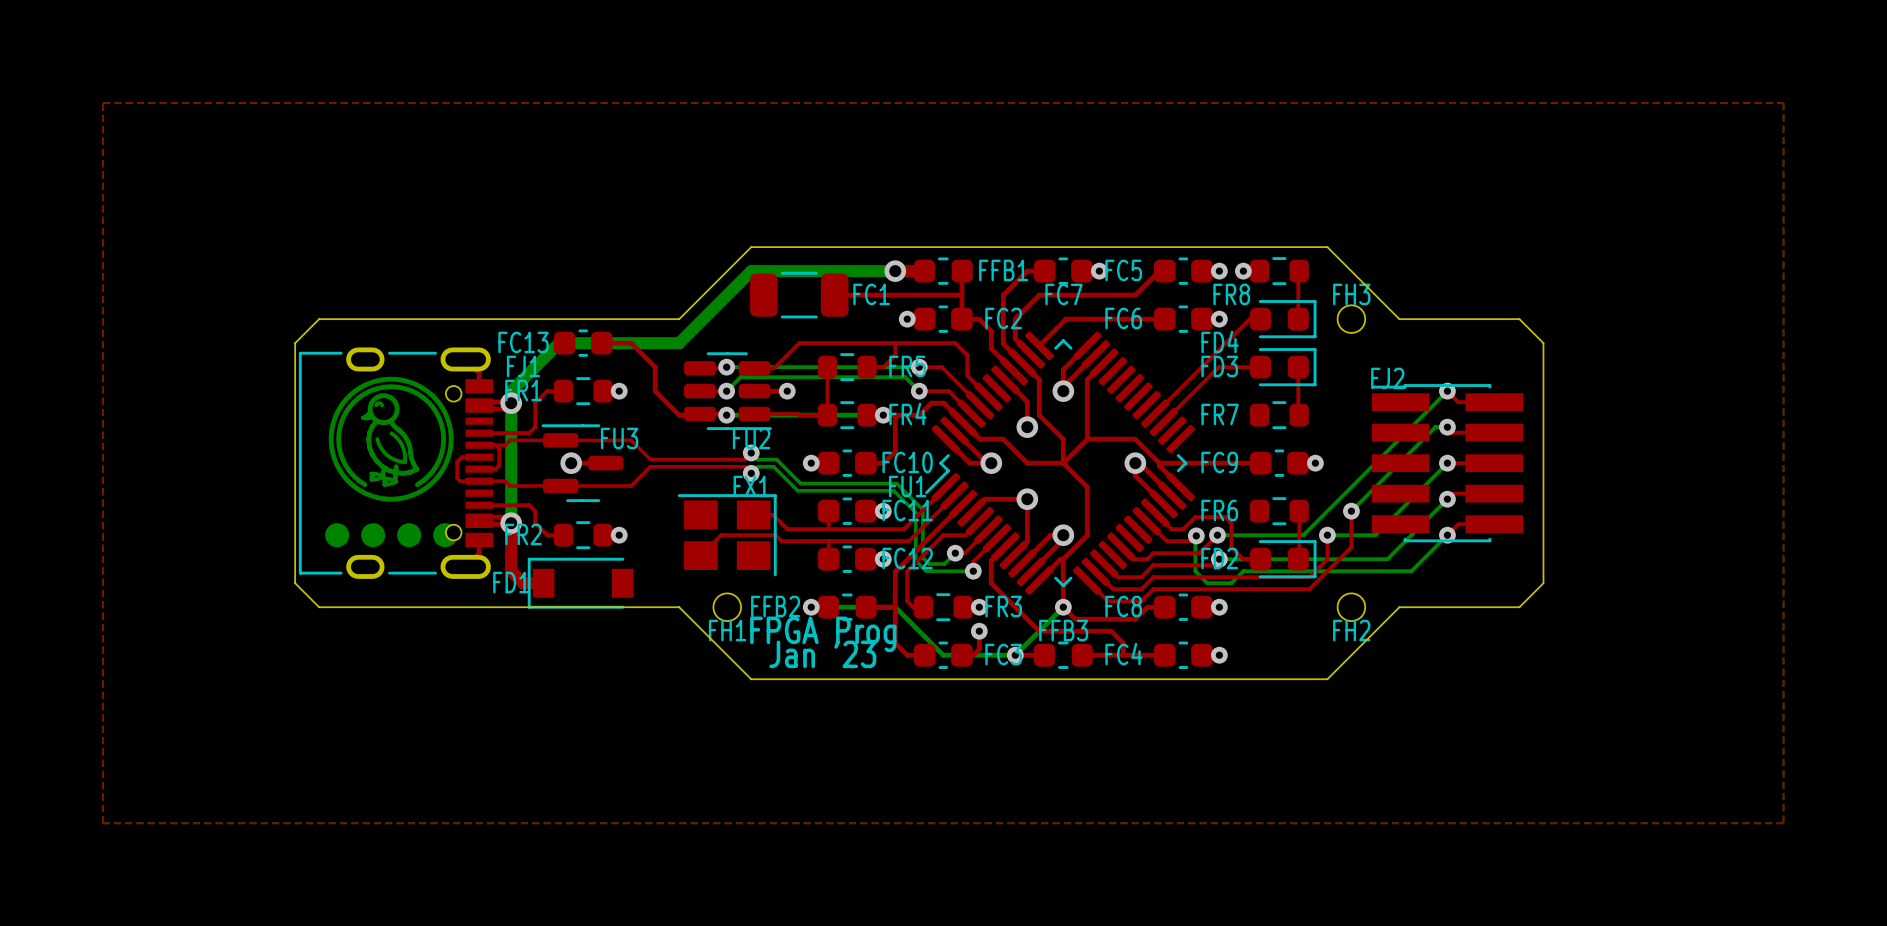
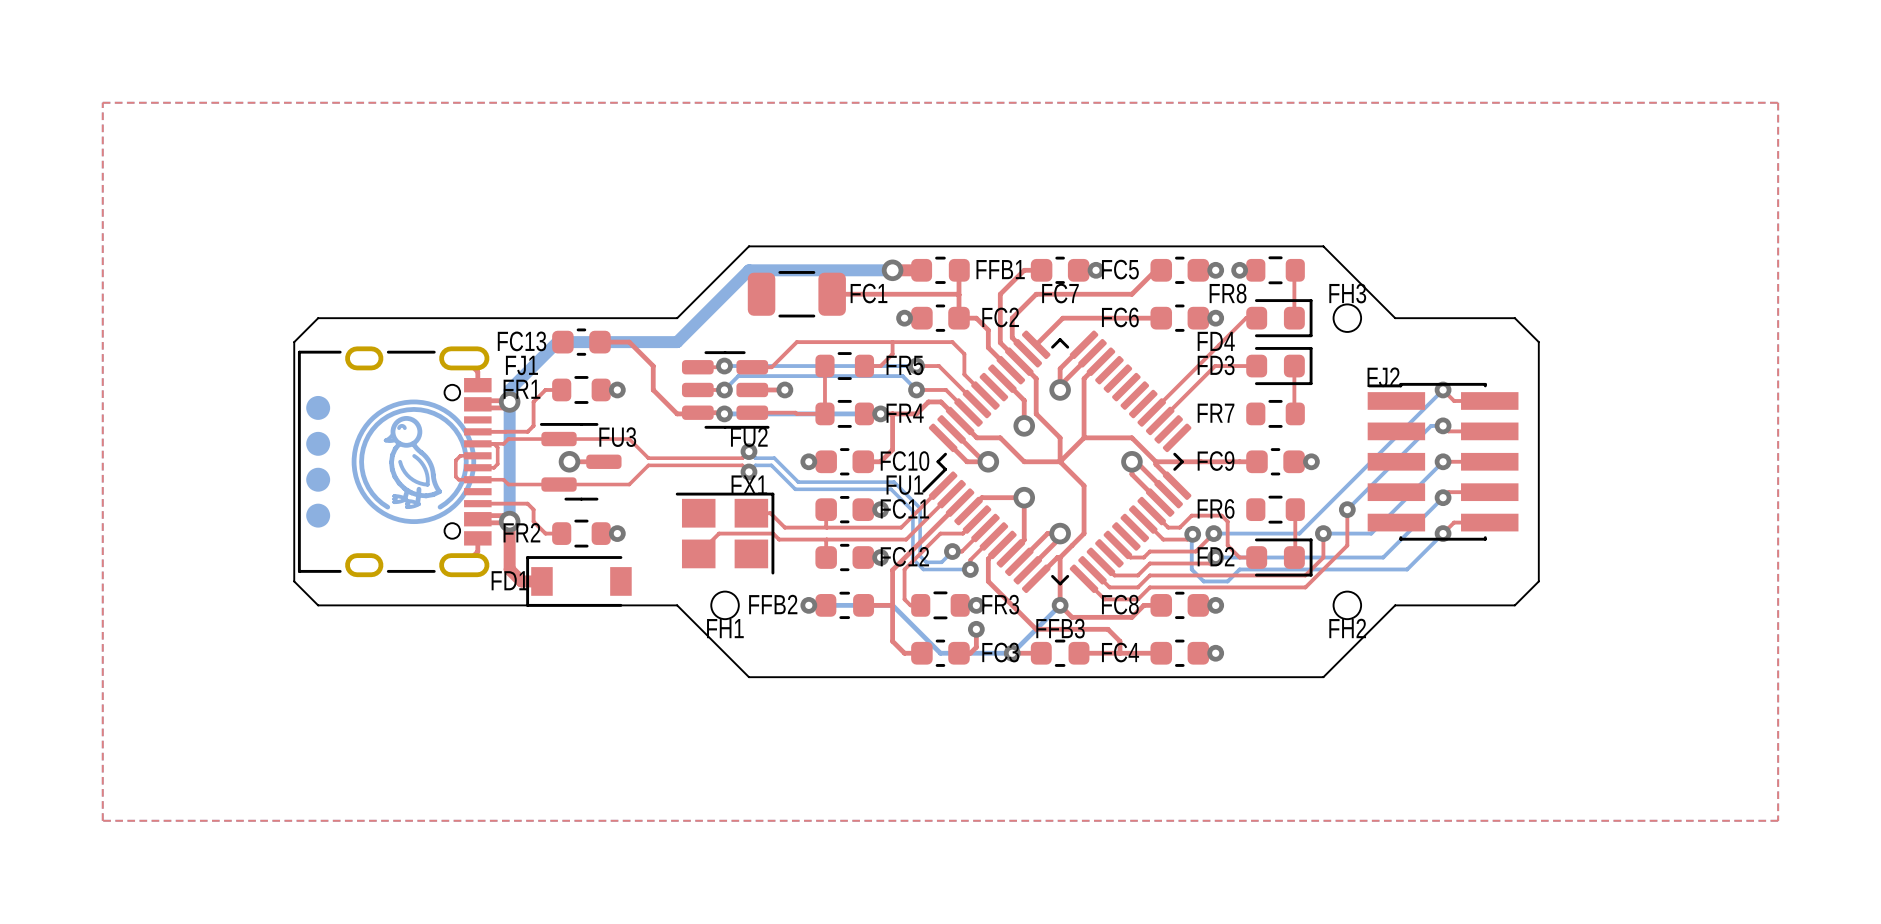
drawing: none -> [306, 395, 331, 528]
drawing position: (391, 439) -> (413, 461)
drawing: [325, 523, 458, 548] -> none
text: FPGA Prog (823, 634) -> none
text: Jan '23 (822, 654) -> none

